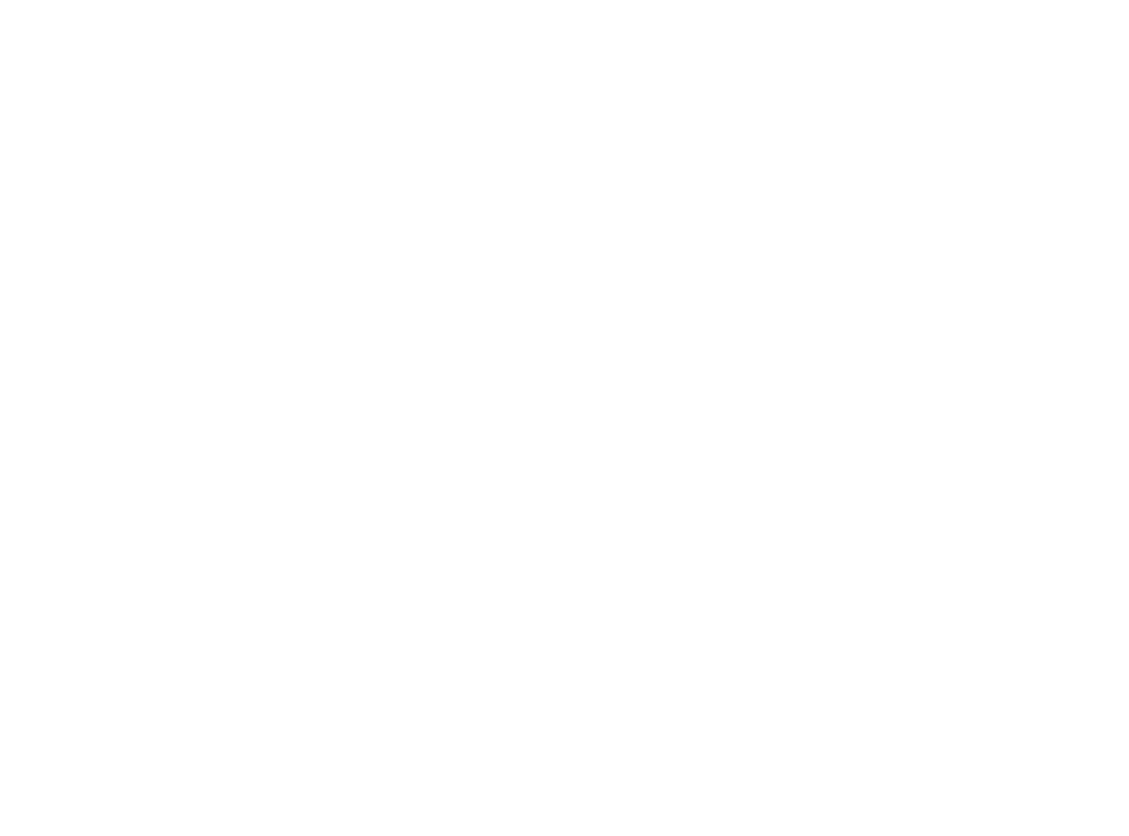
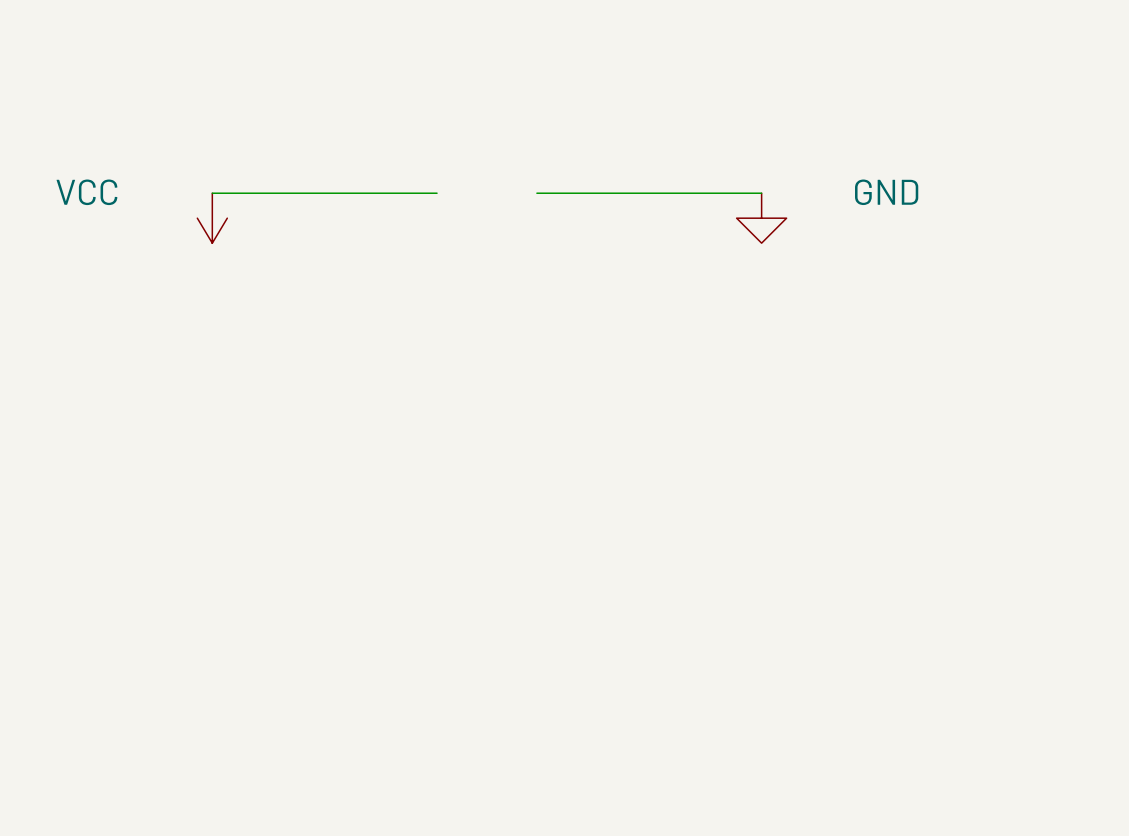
wire: none -> (212, 193) (437, 193)
wire: none -> (536, 193) (761, 193)
power symbol: none -> VCC (212, 218)
power symbol: none -> GND (761, 218)

